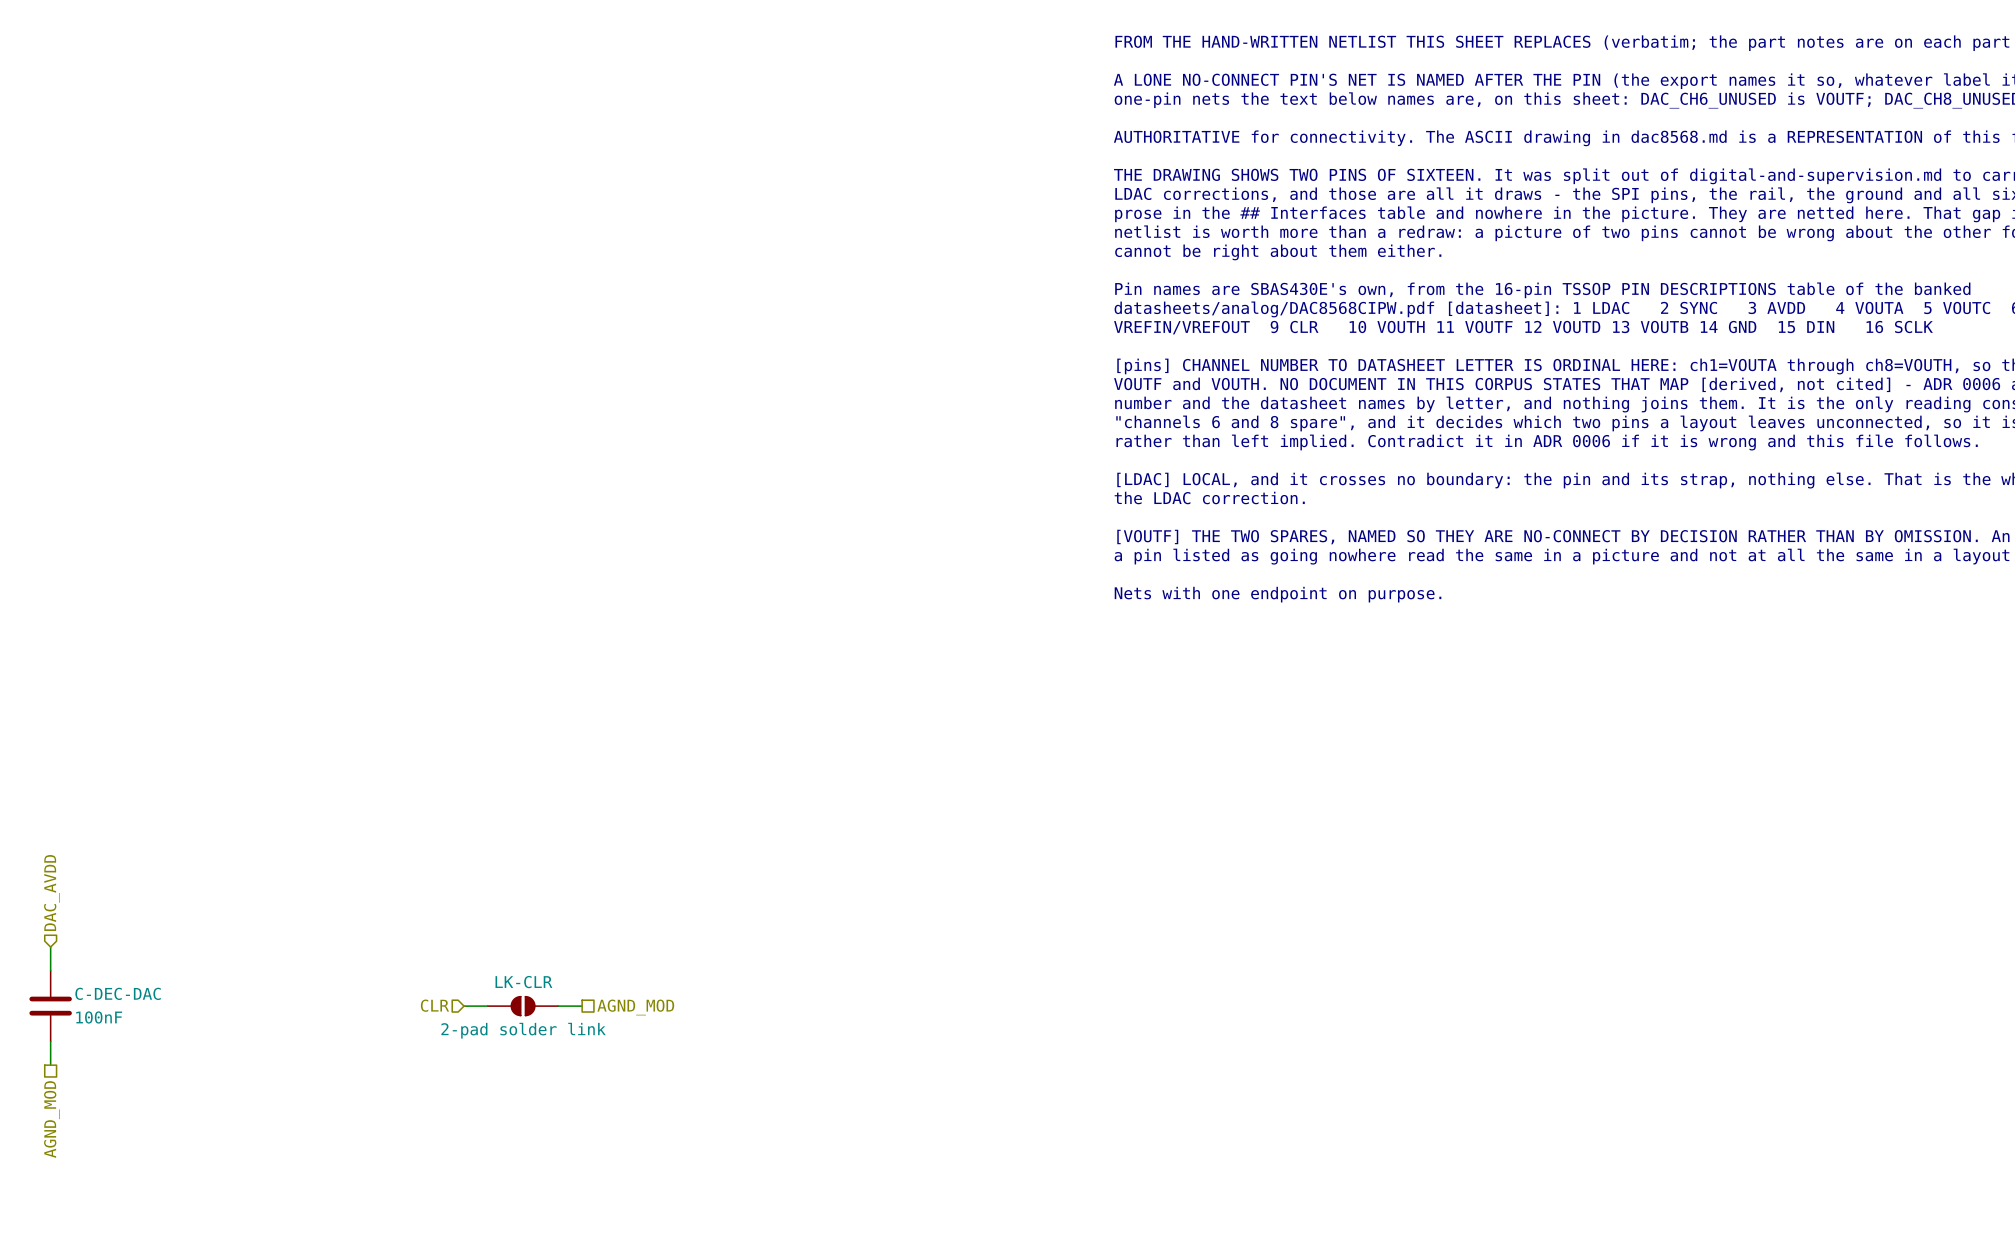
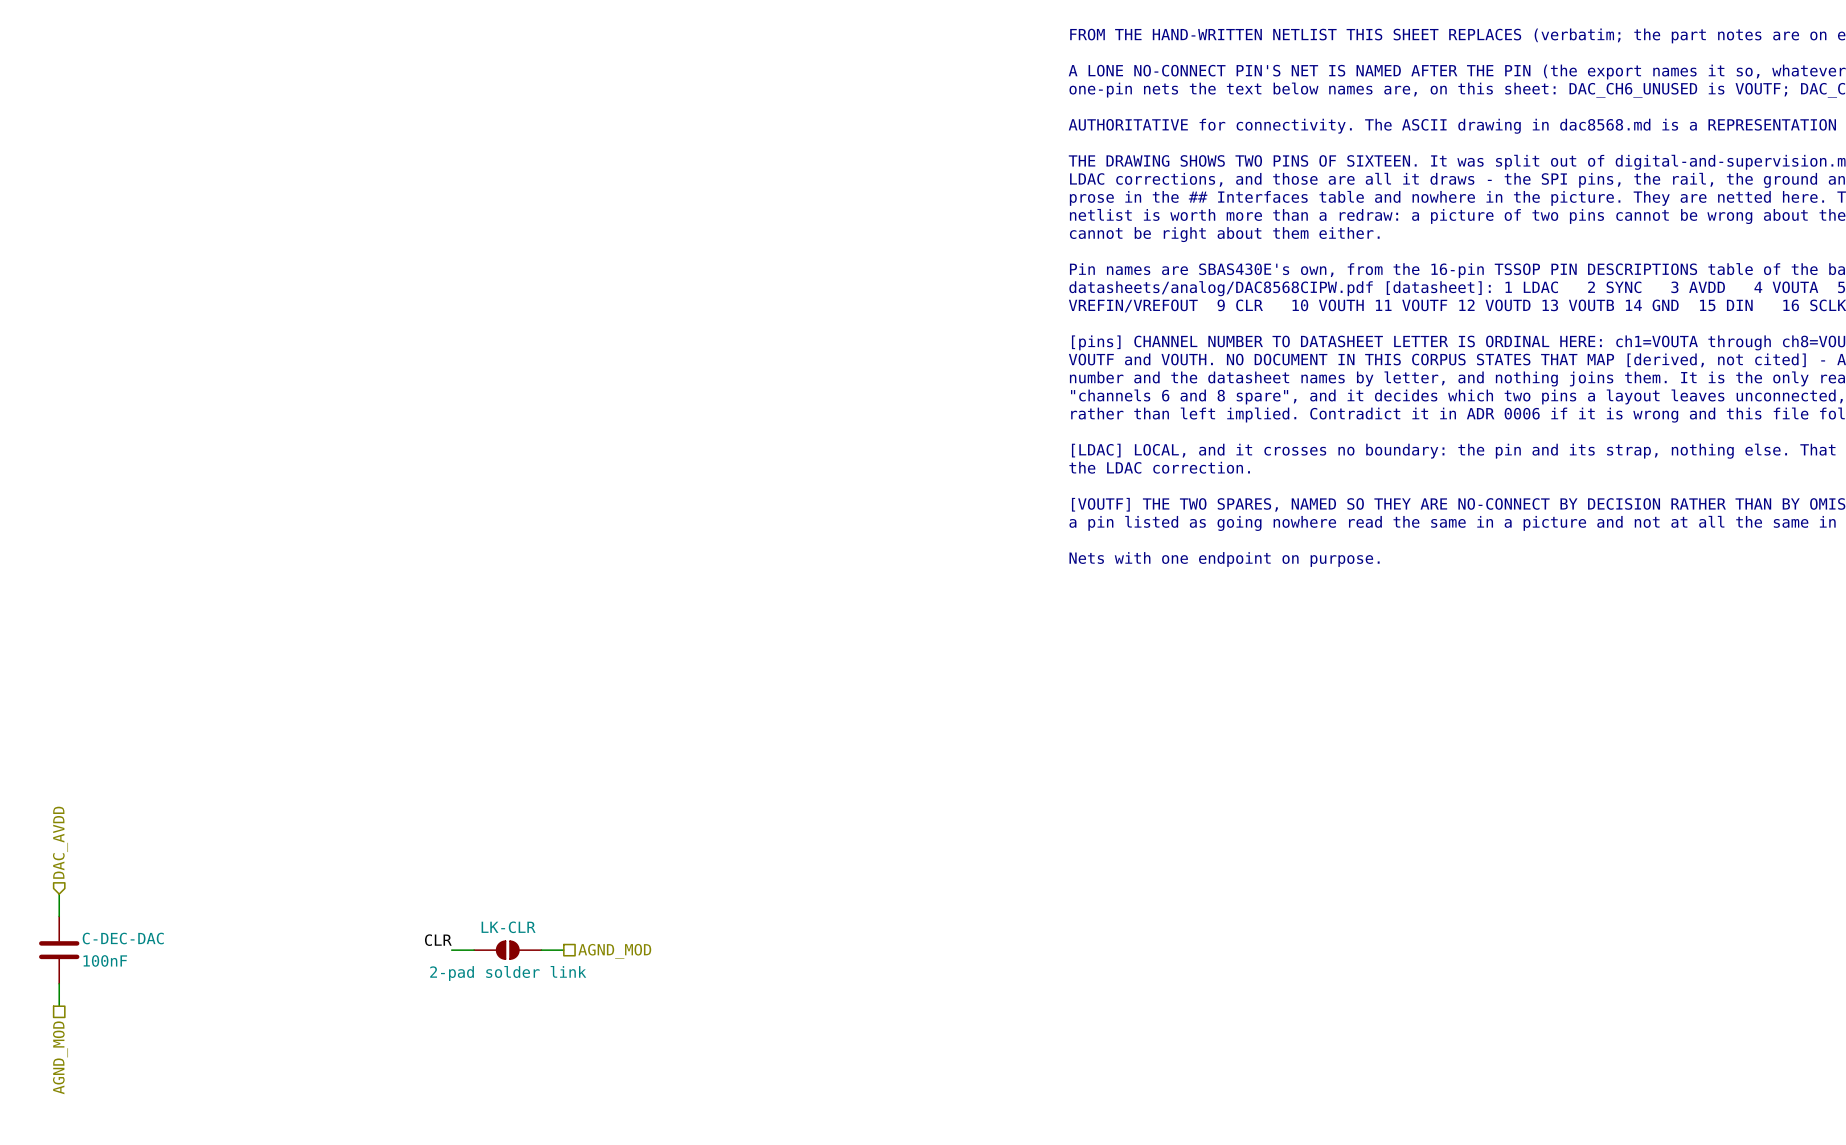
label: none -> CLR (438, 940)
hierarchical label: CLR (434, 1005) -> none

